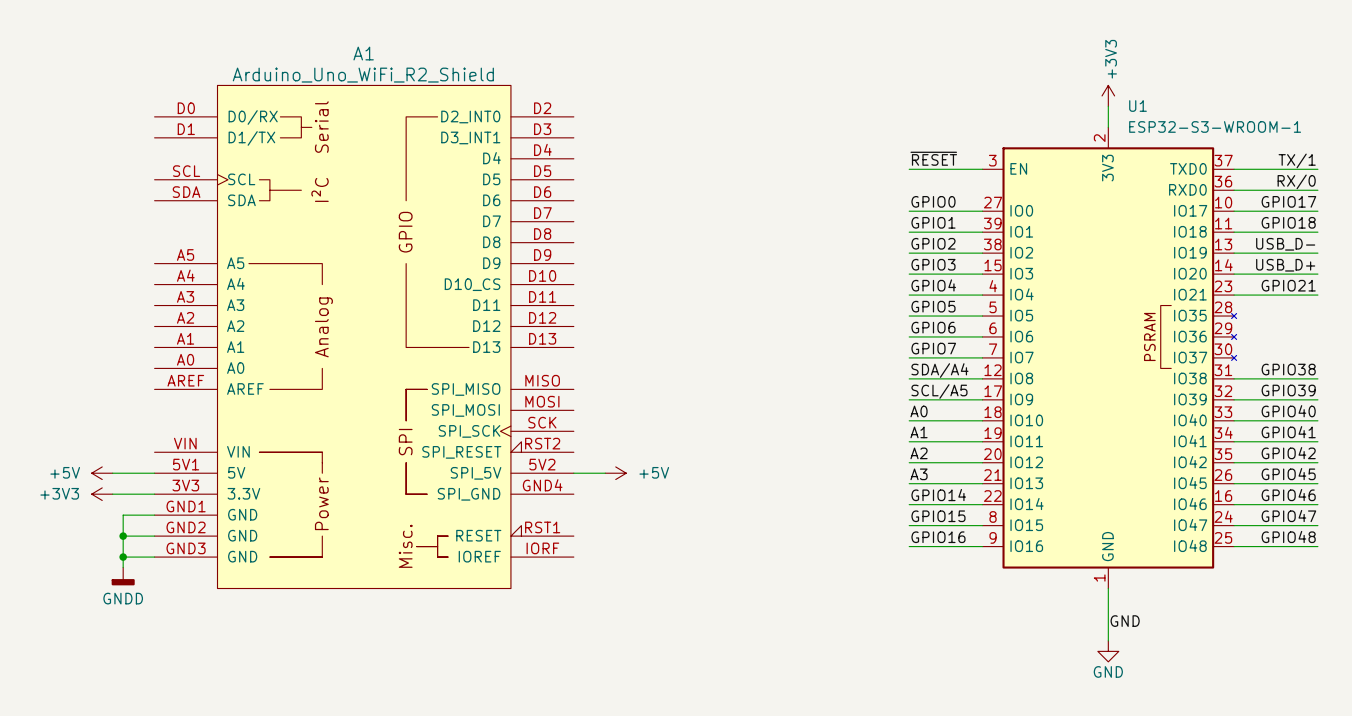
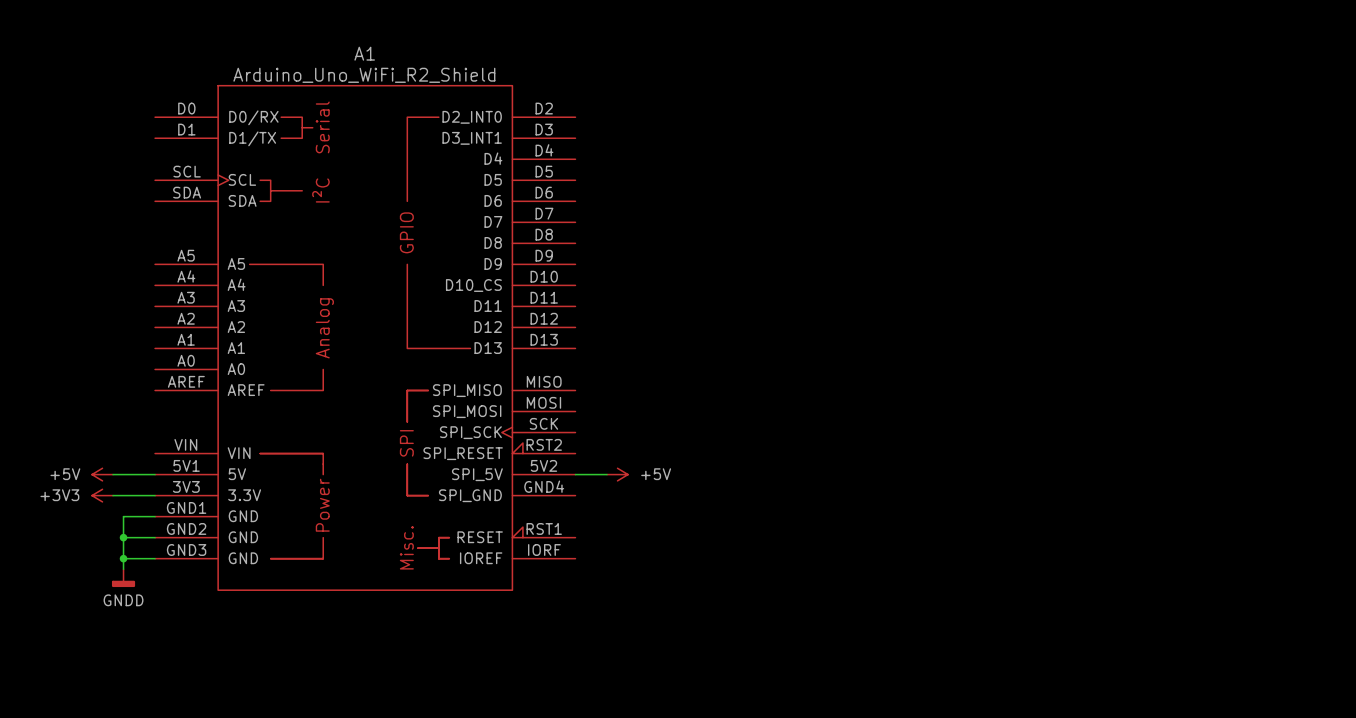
power symbol: +3V3 (1108, 95) -> none
wire: (1108, 106) (1108, 127) -> none
label: ~{RESET} (933, 158) -> none
label: TX/1 (1297, 160) -> none
wire: (909, 169) (982, 169) -> none
wire: (1234, 169) (1317, 169) -> none
label: RX/0 (1296, 181) -> none
wire: (1234, 190) (1317, 190) -> none
label: GPIO0 (933, 201) -> none
label: GPIO17 (1288, 201) -> none
wire: (909, 211) (982, 211) -> none
wire: (1234, 211) (1317, 211) -> none
label: GPIO1 (933, 222) -> none
label: GPIO18 (1288, 222) -> none
wire: (909, 232) (982, 232) -> none
wire: (1234, 232) (1317, 232) -> none
label: GPIO2 (933, 243) -> none
label: USB_D- (1285, 244) -> none
wire: (909, 253) (982, 253) -> none
wire: (1234, 253) (1317, 253) -> none
label: GPIO3 (933, 264) -> none
label: USB_D+ (1285, 265) -> none
wire: (909, 274) (982, 274) -> none
wire: (1234, 274) (1317, 274) -> none
label: GPIO4 (933, 285) -> none
label: GPIO21 (1288, 285) -> none
wire: (909, 295) (982, 295) -> none
wire: (1234, 295) (1317, 295) -> none
label: GPIO5 (933, 306) -> none
wire: (909, 316) (982, 316) -> none
label: GPIO6 (933, 327) -> none
wire: (909, 336) (982, 336) -> none
label: GPIO7 (933, 348) -> none
wire: (909, 357) (982, 357) -> none
U1: ESP32-S3-WROOM-1 (1109, 357) -> none
label: GPIO38 (1288, 369) -> none
label: SDA/A4 (939, 370) -> none
wire: (909, 378) (982, 378) -> none
wire: (1234, 378) (1317, 378) -> none
label: GPIO39 (1288, 390) -> none
label: SCL/A5 (939, 391) -> none
wire: (909, 399) (982, 399) -> none
wire: (1234, 399) (1317, 399) -> none
label: A0 (919, 411) -> none
label: GPIO40 (1288, 411) -> none
wire: (909, 420) (982, 420) -> none
wire: (1234, 420) (1317, 420) -> none
label: A1 (919, 432) -> none
label: GPIO41 (1288, 432) -> none
wire: (909, 441) (982, 441) -> none
wire: (1234, 441) (1317, 441) -> none
label: A2 (919, 453) -> none
label: GPIO42 (1288, 453) -> none
wire: (909, 462) (982, 462) -> none
wire: (1234, 462) (1317, 462) -> none
label: A3 (919, 474) -> none
label: GPIO45 (1288, 474) -> none
wire: (909, 483) (982, 483) -> none
wire: (1234, 483) (1317, 483) -> none
label: GPIO14 (938, 495) -> none
label: GPIO46 (1288, 495) -> none
wire: (909, 504) (982, 504) -> none
wire: (1234, 504) (1317, 504) -> none
label: GPIO15 (938, 516) -> none
label: GPIO47 (1288, 516) -> none
wire: (909, 525) (982, 525) -> none
wire: (1234, 525) (1317, 525) -> none
label: GPIO48 (1288, 536) -> none
label: GPIO16 (938, 537) -> none
wire: (909, 546) (982, 546) -> none
wire: (1234, 546) (1317, 546) -> none
wire: (1108, 588) (1108, 640) -> none
label: GND (1125, 621) -> none
power symbol: GND (1108, 651) -> none

